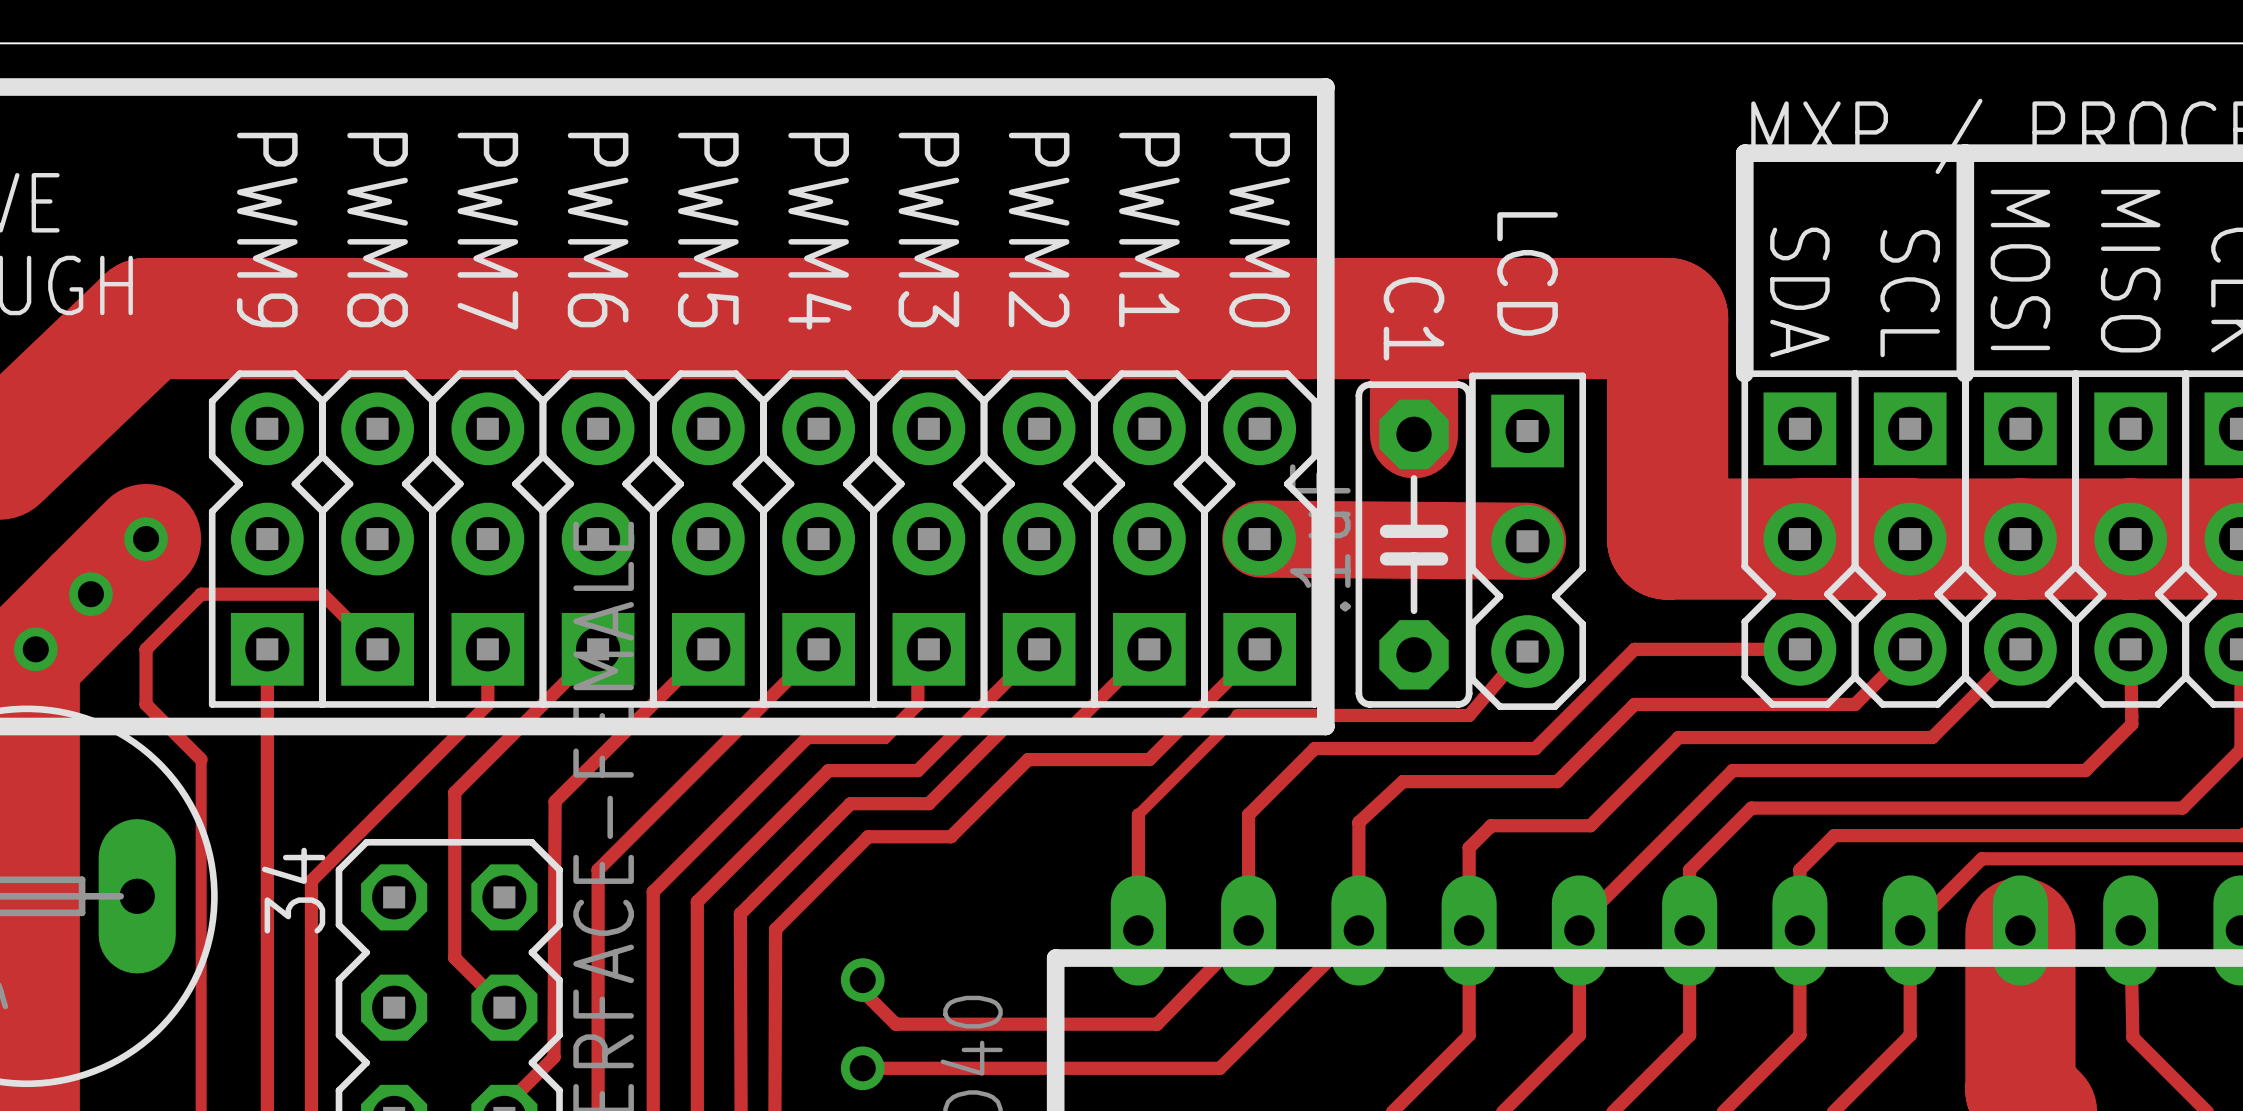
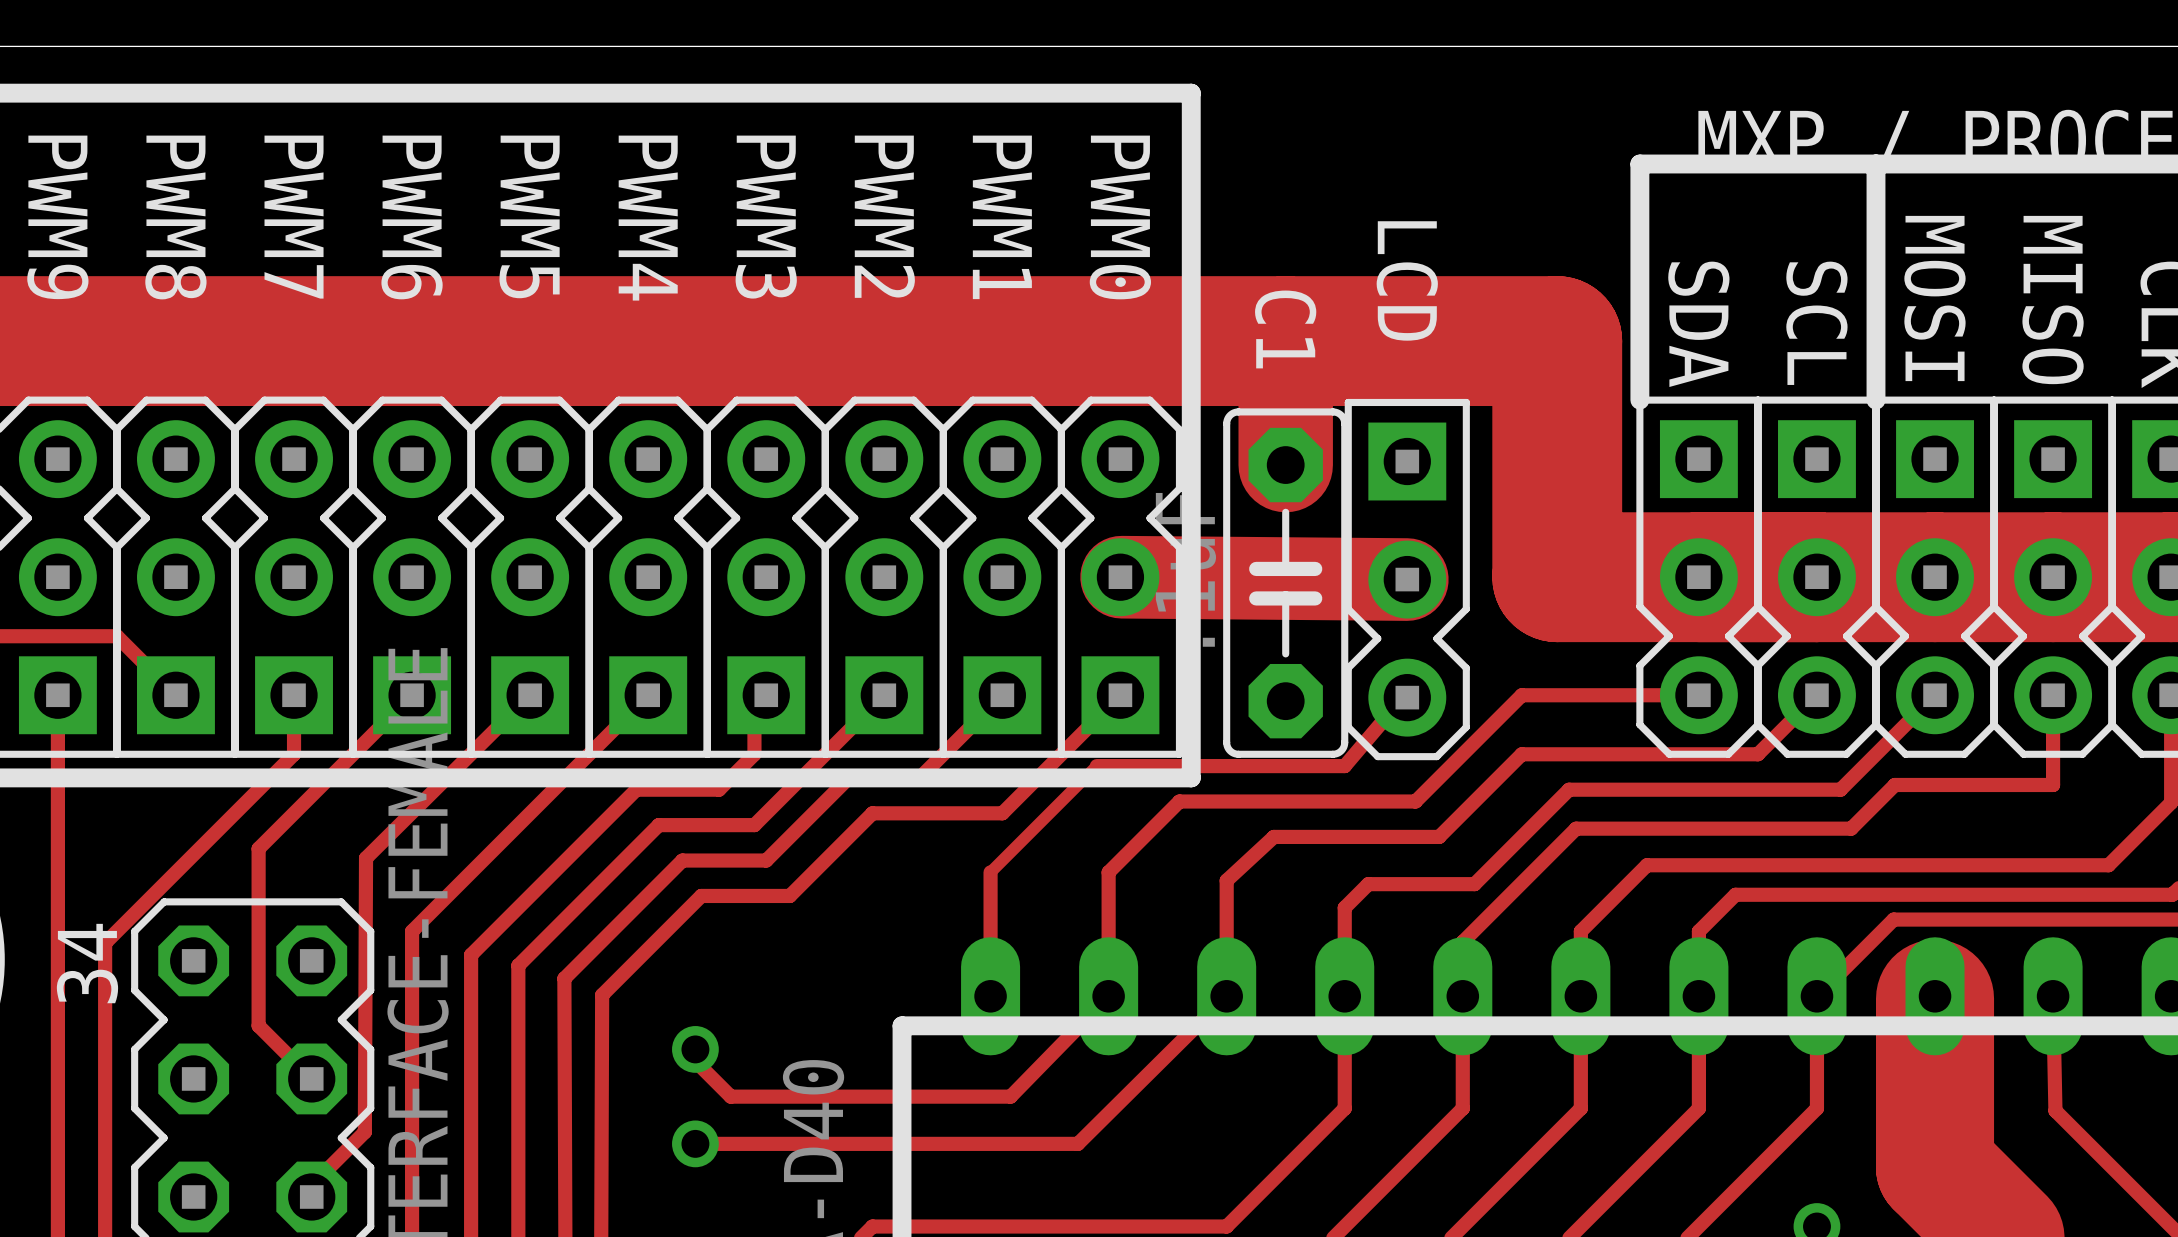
track: (2130, 649) (2131, 724) (2085, 770) (1732, 770) (1579, 923) -> (2053, 695) (2053, 784) (1894, 784) (1851, 828) (1576, 828) (1462, 942) (1462, 989)

